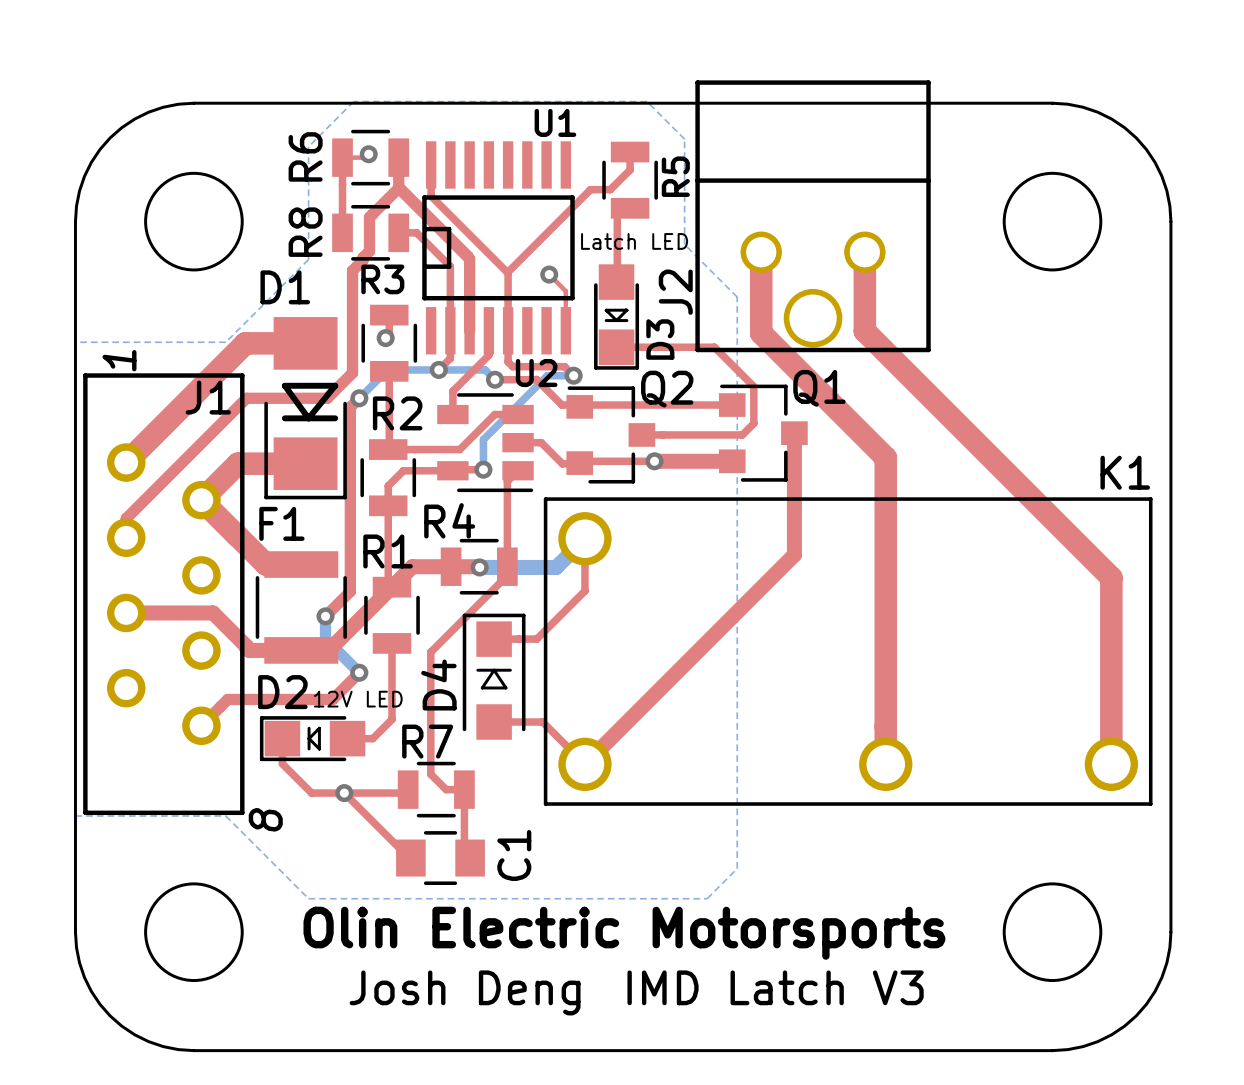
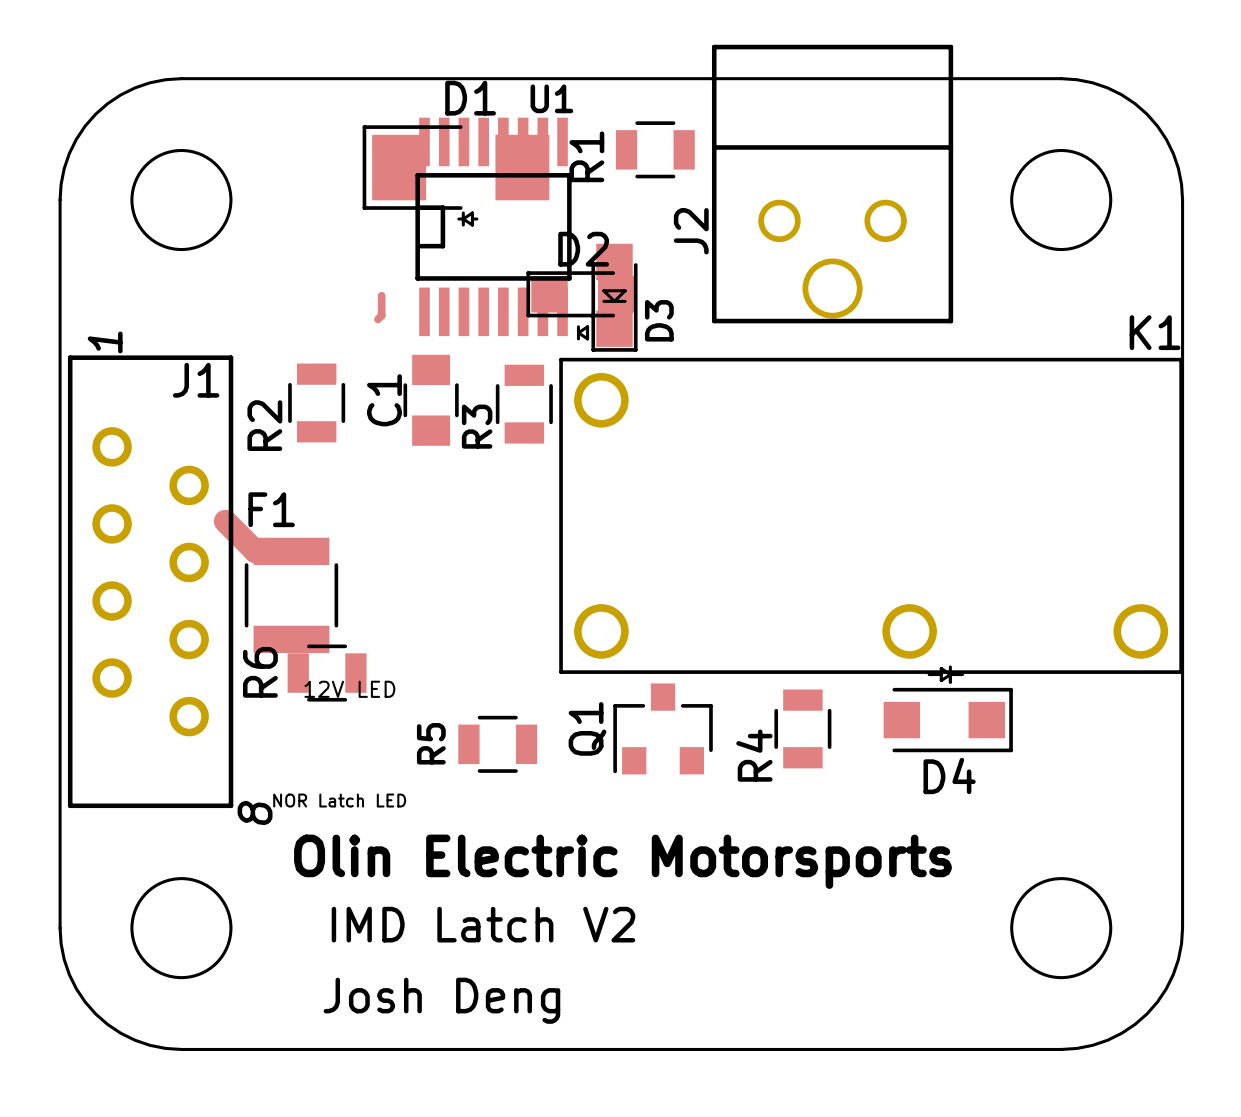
bottom zone outline: (353, 101) (647, 101) (684, 139) (684, 244) (737, 297) (737, 868) (707, 898) (308, 898) (225, 816) (75, 816) (75, 342) (225, 342) (308, 259) (308, 146) (353, 101) -> none
top track: (630, 152) (630, 169) (610, 189) (590, 189) (508, 272) (508, 361) (512, 366) (564, 366) (573, 375) -> none
top track: (368, 154) (365, 157) (342, 157) (342, 232) -> none
via: (368, 154) -> none
R6 position: (370, 157) -> (327, 673)
top track: (431, 164) (431, 196) (508, 273) -> none
R5 name position: R5 (675, 176) -> R5 (431, 743)
R5 rotation: 0° (630, 180) -> 90° clockwise (497, 744)
R5 position: (630, 180) -> (497, 744)
top track: (398, 188) (369, 217) (369, 251) (352, 270) (352, 373) (327, 398) (246, 398) (126, 518) (126, 537) -> none
top track: (398, 188) (398, 157) (398, 184) (469, 255) (469, 330) (469, 259) (398, 188) -> none
top track: (617, 211) (616, 282) -> none
J2 position: (813, 216) -> (832, 184)
R8: (370, 232) -> none
top track: (398, 232) (416, 232) (450, 266) (450, 358) (438, 369) -> none
text: Latch LED (634, 241) -> none
top track: (761, 252) (761, 333) (885, 457) (885, 764) -> none
top track: (864, 252) (864, 331) (1111, 577) (1111, 764) -> none
top track: (549, 274) (565, 291) (565, 330) -> none
via: (549, 274) -> none
R3 name rotation: 0° (382, 279) -> 90° counterclockwise (477, 426)
R3 name position: R3 (382, 279) -> R3 (477, 426)
J2 name position: J2 (675, 292) -> J2 (691, 231)
D1 footprint: [264, 317, 347, 500] -> [362, 125, 550, 227]
top track: (488, 330) (488, 355) (452, 391) (452, 414) -> none
via: (385, 338) -> none
top track: (311, 343) (245, 343) (126, 462) -> none
R3 position: (389, 343) -> (524, 404)
top track: (616, 347) (714, 347) (753, 386) (753, 423) (742, 434) (641, 434) -> none
via: (438, 369) -> none
top track: (389, 371) (388, 449) (459, 449) (494, 414) (518, 414) -> none
bottom track: (573, 375) (547, 375) (483, 439) (483, 469) -> none
via: (573, 375) -> none
top track: (494, 379) (536, 379) -> none
bottom track: (494, 379) (485, 369) (387, 369) (359, 398) -> none
via: (494, 379) -> none
top track: (536, 379) (561, 405) (577, 405) (579, 406) (581, 405) (732, 405) -> none
Q1 name position: Q1 (819, 388) -> Q1 (587, 728)
top track: (359, 398) (350, 407) (350, 591) (325, 616) -> none
via: (359, 398) -> none
R2 name rotation: 0° (397, 413) -> 90° counterclockwise (264, 425)
R2 name position: R2 (397, 413) -> R2 (264, 425)
Q1 rotation: 0° (763, 433) -> 90° counterclockwise (663, 728)
Q1 position: (763, 433) -> (663, 728)
top track: (794, 433) (794, 554) (584, 764) (542, 722) (494, 722) -> none
Q2: (610, 434) -> none
U2: (485, 442) -> none
top track: (518, 442) (541, 442) (562, 463) (579, 463) (581, 461) (732, 461) -> none
via: (654, 461) -> none
top track: (305, 463) (237, 463) (201, 500) (236, 535) -> none
top track: (483, 469) (403, 470) (388, 485) (388, 583) (391, 587) -> none
via: (483, 469) -> none
top track: (518, 470) (507, 481) (507, 575) (430, 652) (430, 774) (446, 789) (464, 789) (464, 852) (470, 858) -> none
R2 position: (388, 477) -> (316, 402)
R4 name position: R4 (449, 520) -> R4 (754, 755)
top track: (584, 538) (584, 590) (536, 639) (494, 639) -> none
bottom track: (584, 538) (556, 567) (479, 567) -> none
R1 name position: R1 (388, 551) -> R1 (586, 156)
R4 rotation: 0° (479, 566) -> 90° clockwise (802, 728)
R4 position: (479, 566) -> (802, 728)
top track: (479, 567) (412, 566) (328, 650) (249, 650) (213, 612) (126, 612) -> none
via: (479, 567) -> none
D4 footprint: [462, 613, 526, 740] -> [883, 665, 1013, 753]
R1 rotation: 0° (391, 615) -> 90° clockwise (655, 149)
R1 position: (391, 615) -> (655, 149)
bottom track: (325, 616) (325, 638) (359, 672) -> none
via: (325, 616) -> none
top track: (391, 643) (391, 719) (372, 738) (347, 738) -> none
K1 position: (848, 651) -> (871, 515)
top track: (359, 672) (332, 699) (227, 699) (201, 725) -> none
via: (359, 672) -> none
D4 name position: D4 (438, 685) -> D4 (949, 776)
D2 footprint: [259, 716, 366, 762] -> [526, 271, 635, 341]
top track: (282, 738) (282, 763) (311, 793) (404, 793) (408, 789) -> none
R7: (436, 789) -> none
top track: (344, 793) (410, 858) -> none
via: (344, 793) -> none
text: none -> NOR Latch LED (339, 800)
C1 name position: C1 (514, 855) -> C1 (384, 400)
C1 rotation: 0° (440, 858) -> 90° clockwise (431, 400)
C1 position: (440, 858) -> (431, 400)
text position: Olin Electric Motorsports (624, 933) -> Olin Electric Motorsports (622, 861)
text: IMD Latch V3 (775, 987) -> IMD Latch V2 (483, 924)
text position: Josh Deng (465, 992) -> Josh Deng (441, 1000)

